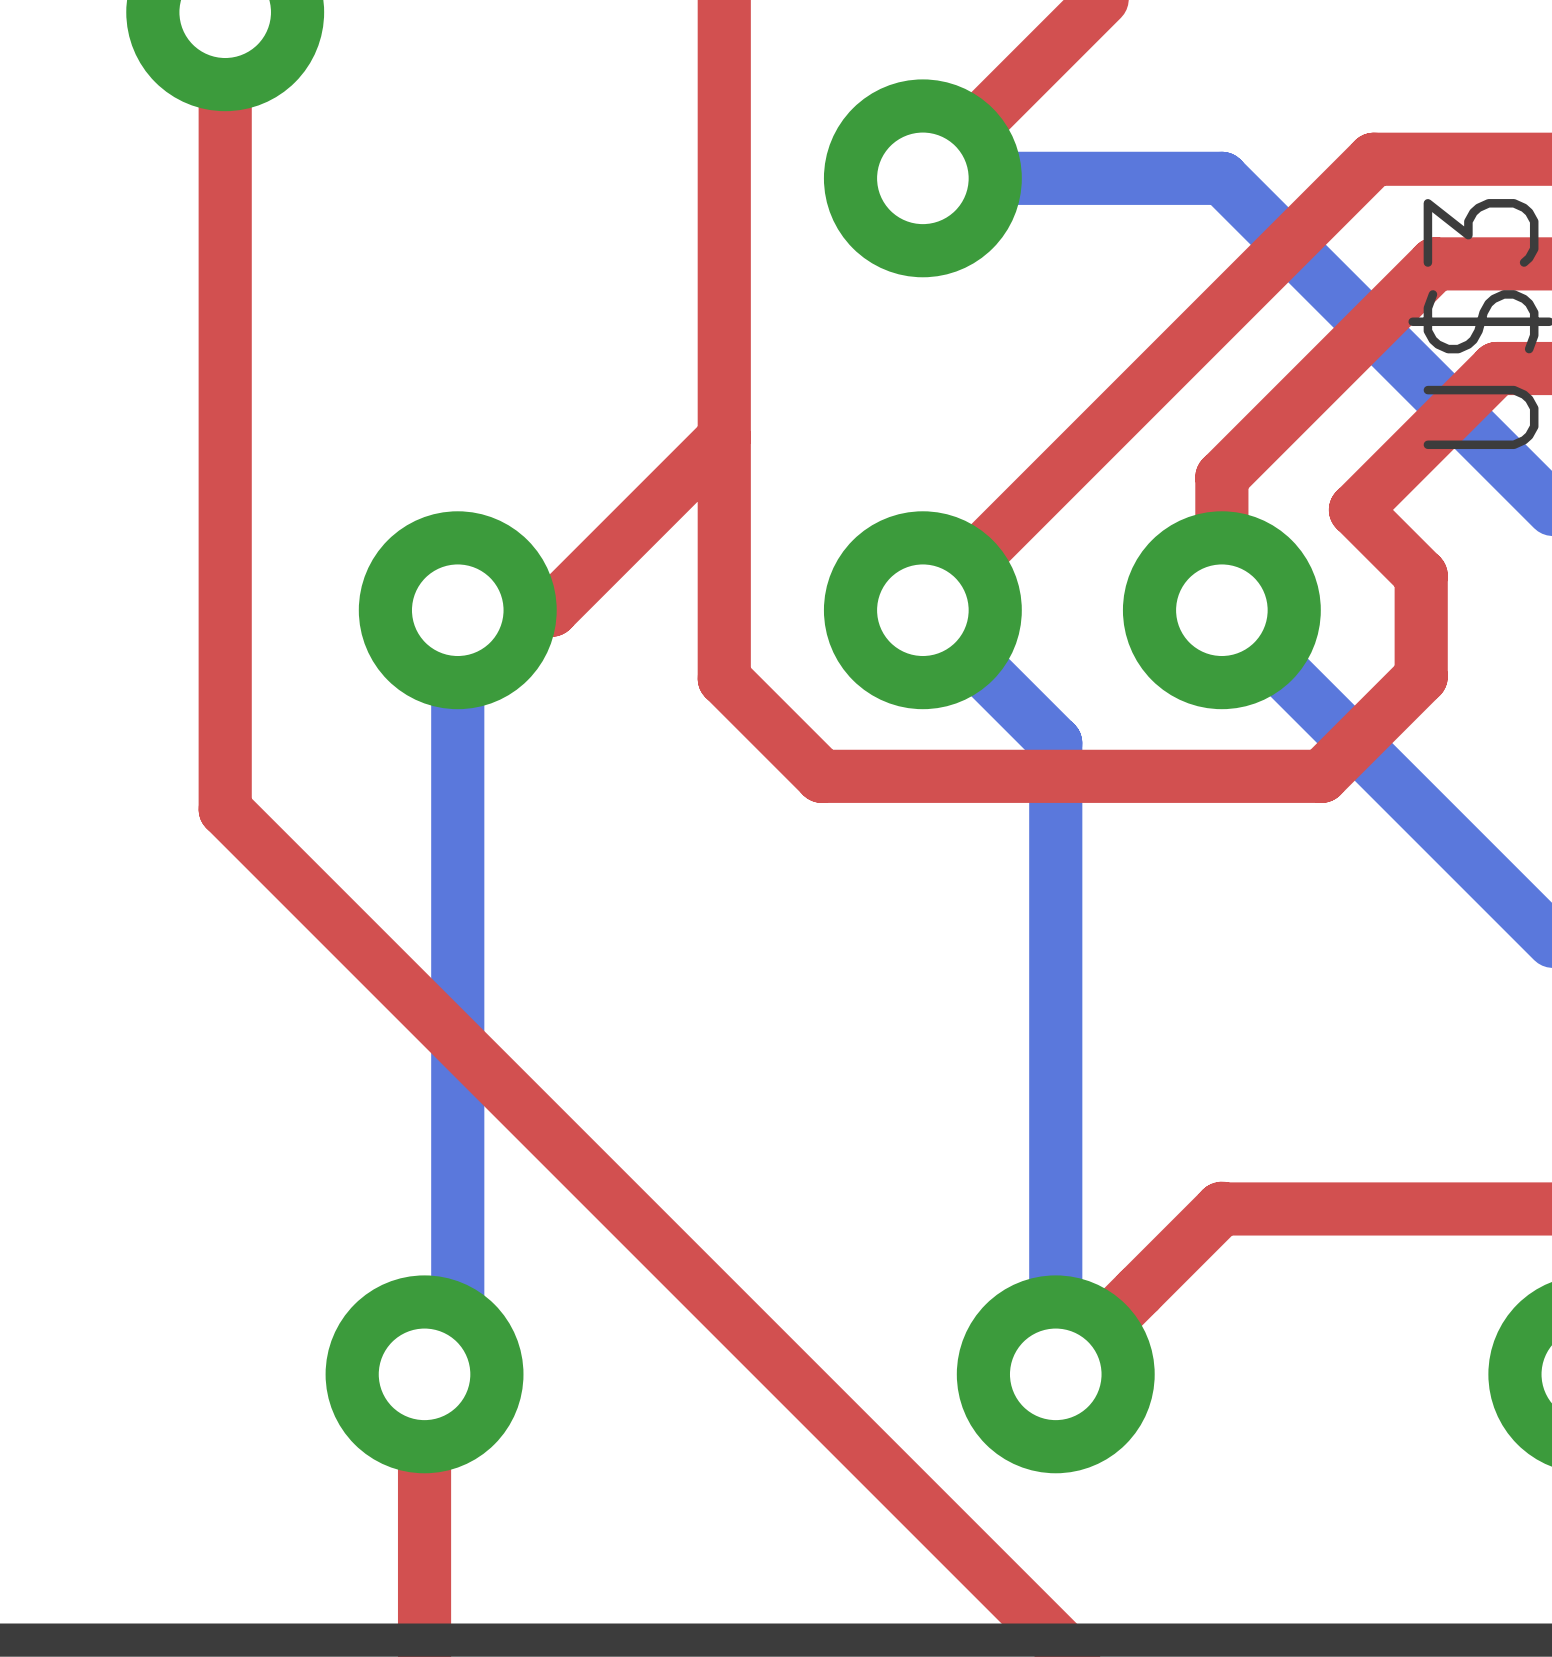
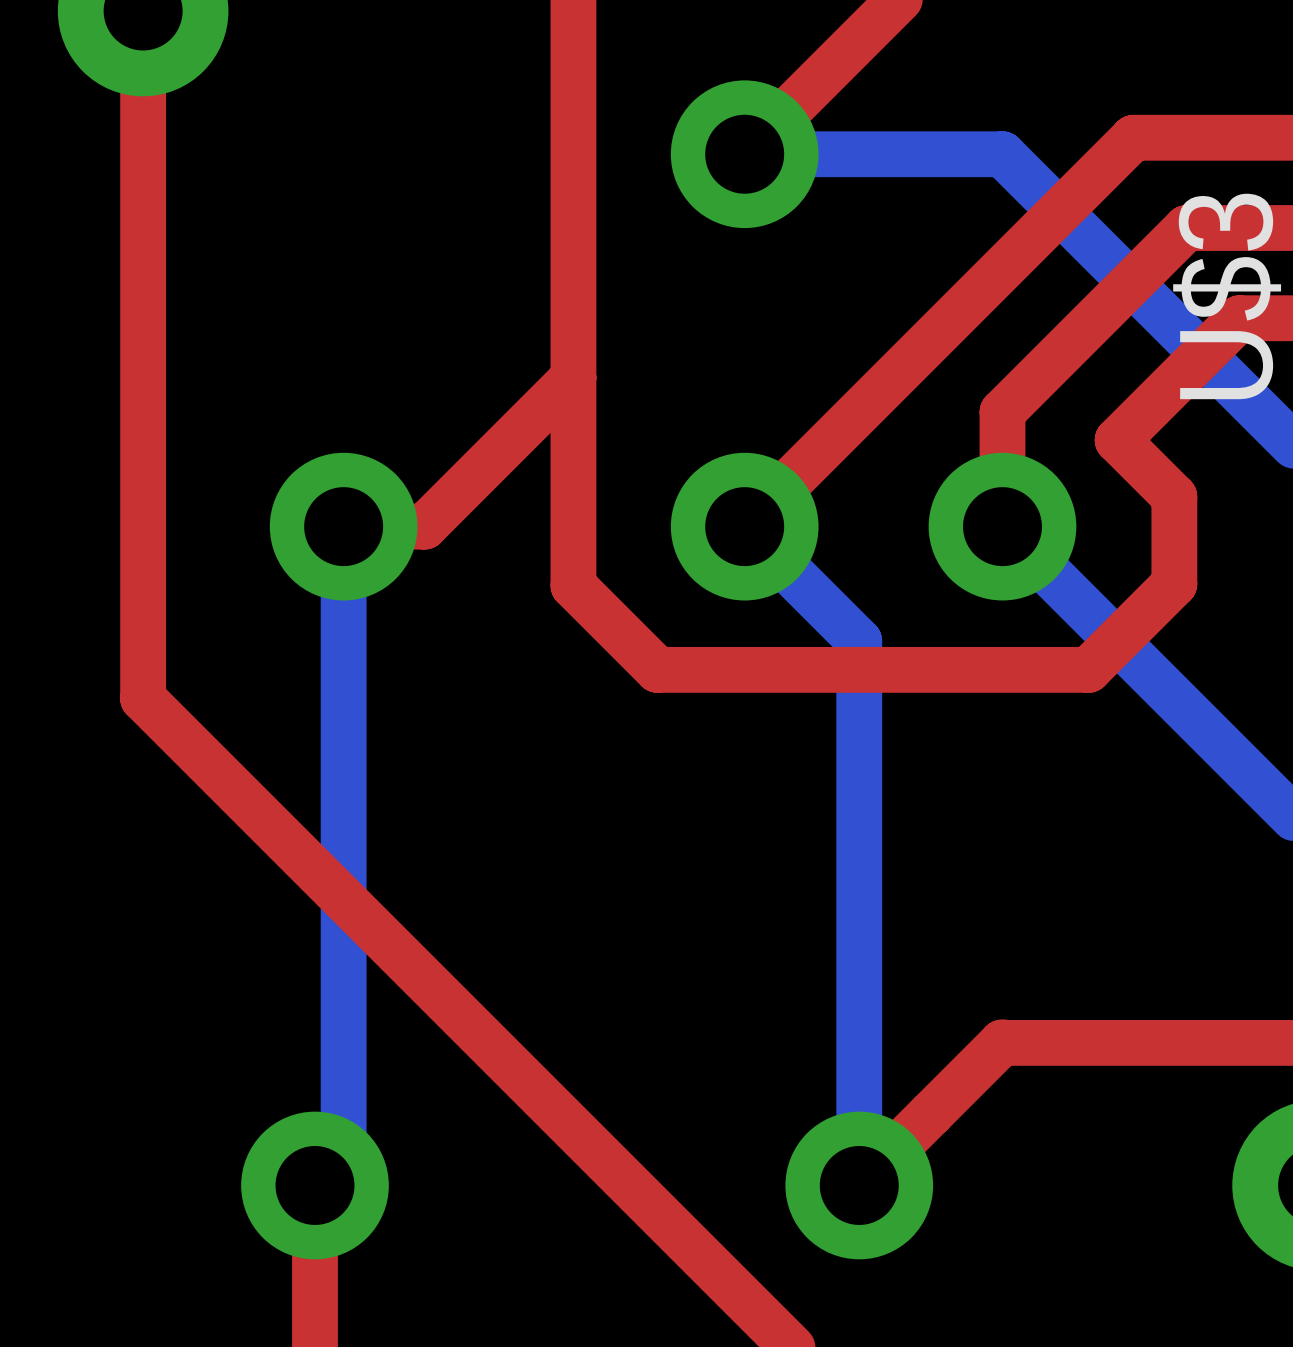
via size: [823, 79, 1022, 278] -> [670, 80, 819, 229]
via size: [358, 511, 557, 710] -> [269, 452, 418, 601]
via size: [823, 511, 1022, 710] -> [670, 452, 819, 601]
via size: [1122, 511, 1321, 710] -> [928, 452, 1077, 601]
via size: [325, 1275, 524, 1474] -> [241, 1111, 389, 1260]
via size: [956, 1275, 1155, 1474] -> [785, 1111, 934, 1260]

